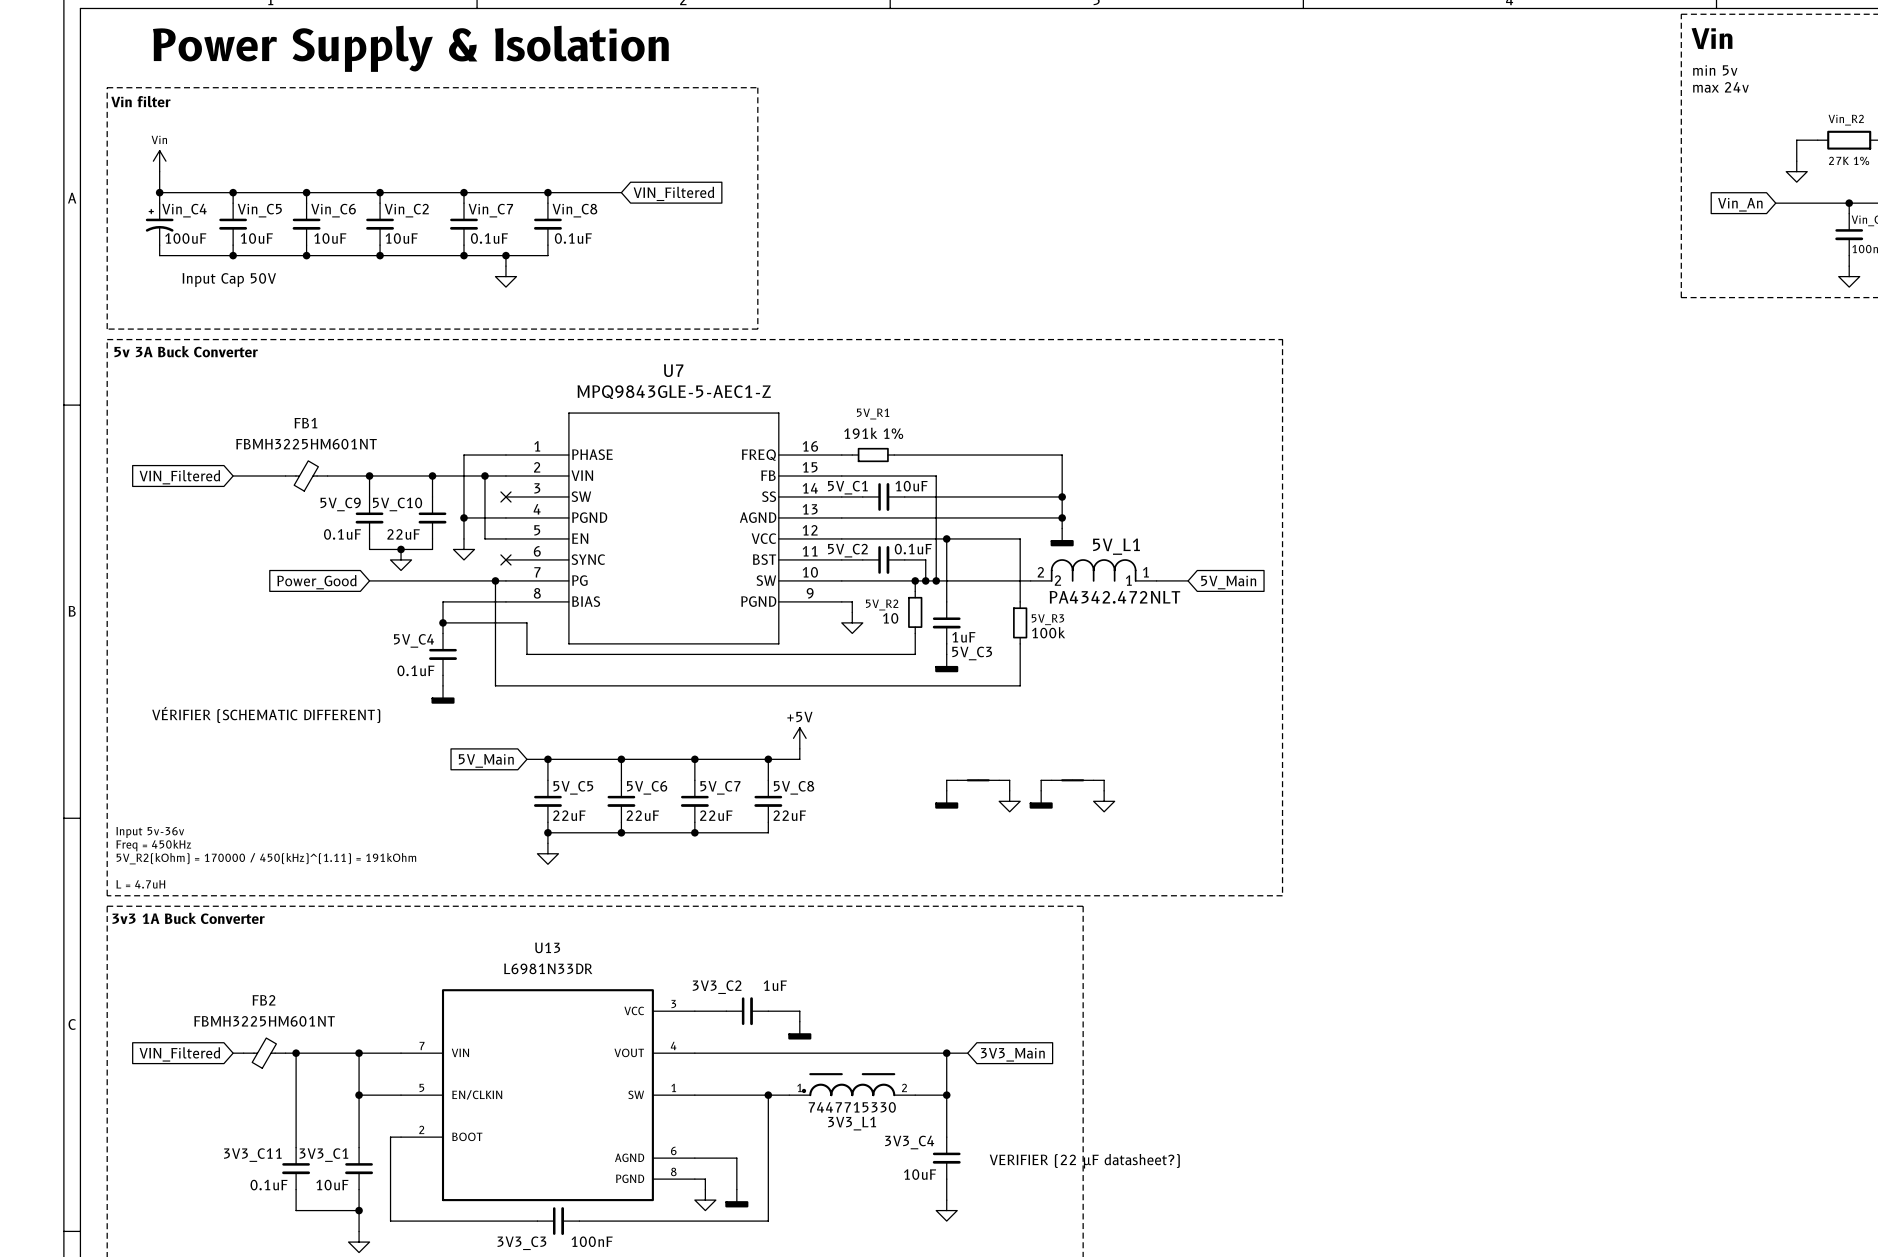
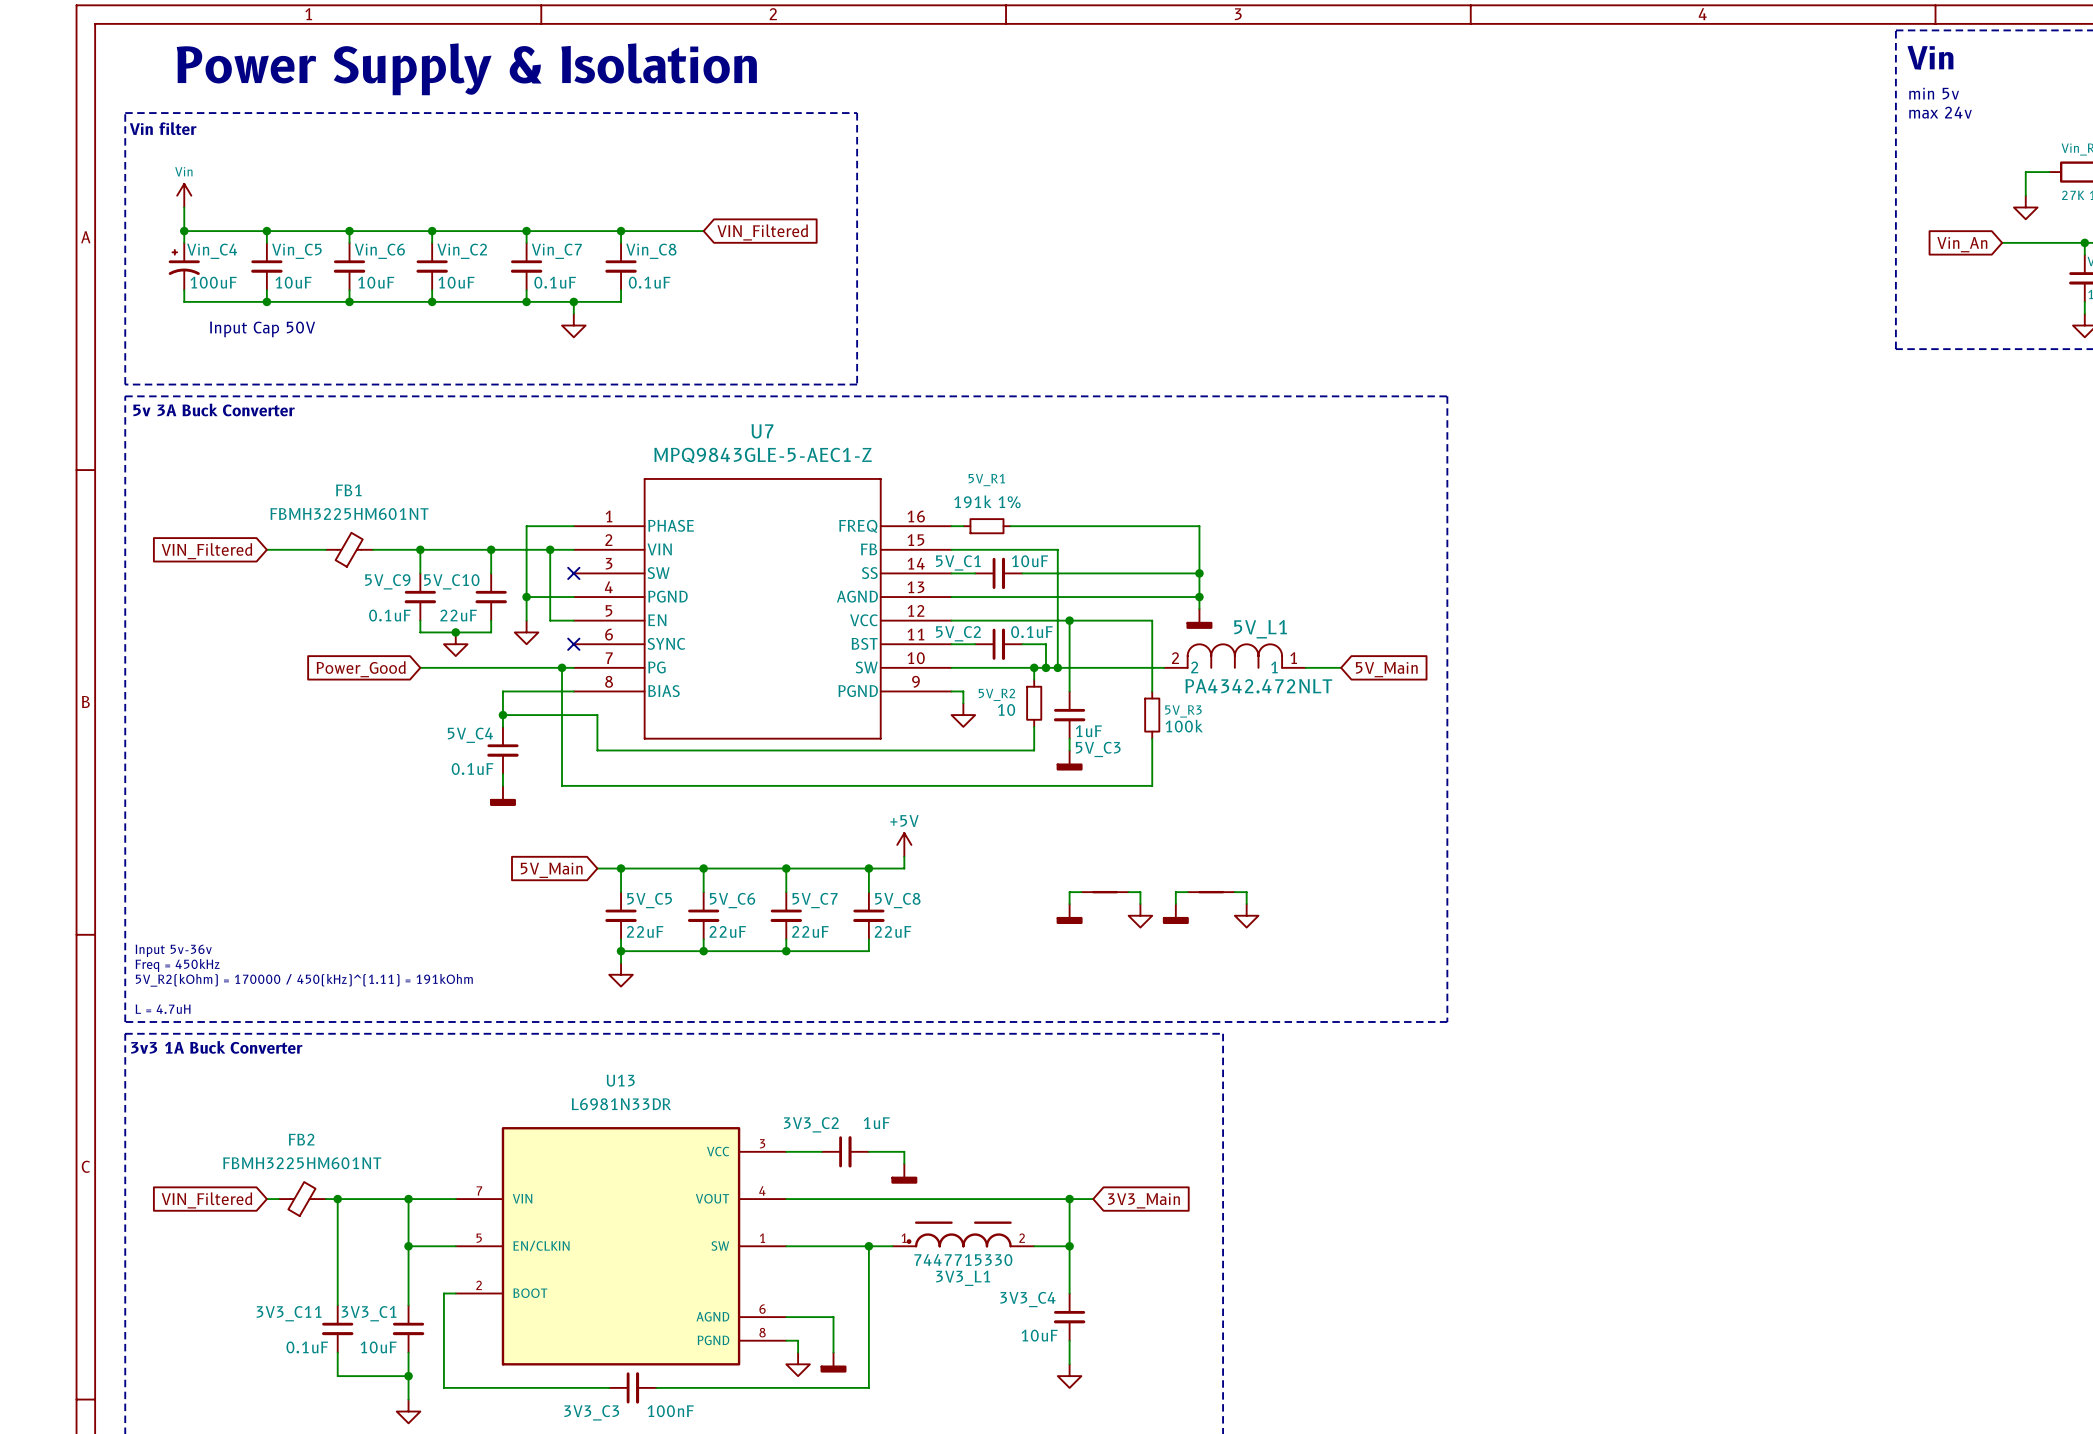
text: VÉRIFIER (SCHEMATIC DIFFERENT) (266, 714) -> none
text: VERIFIER (22 µF datasheet?) (1084, 1161) -> none

